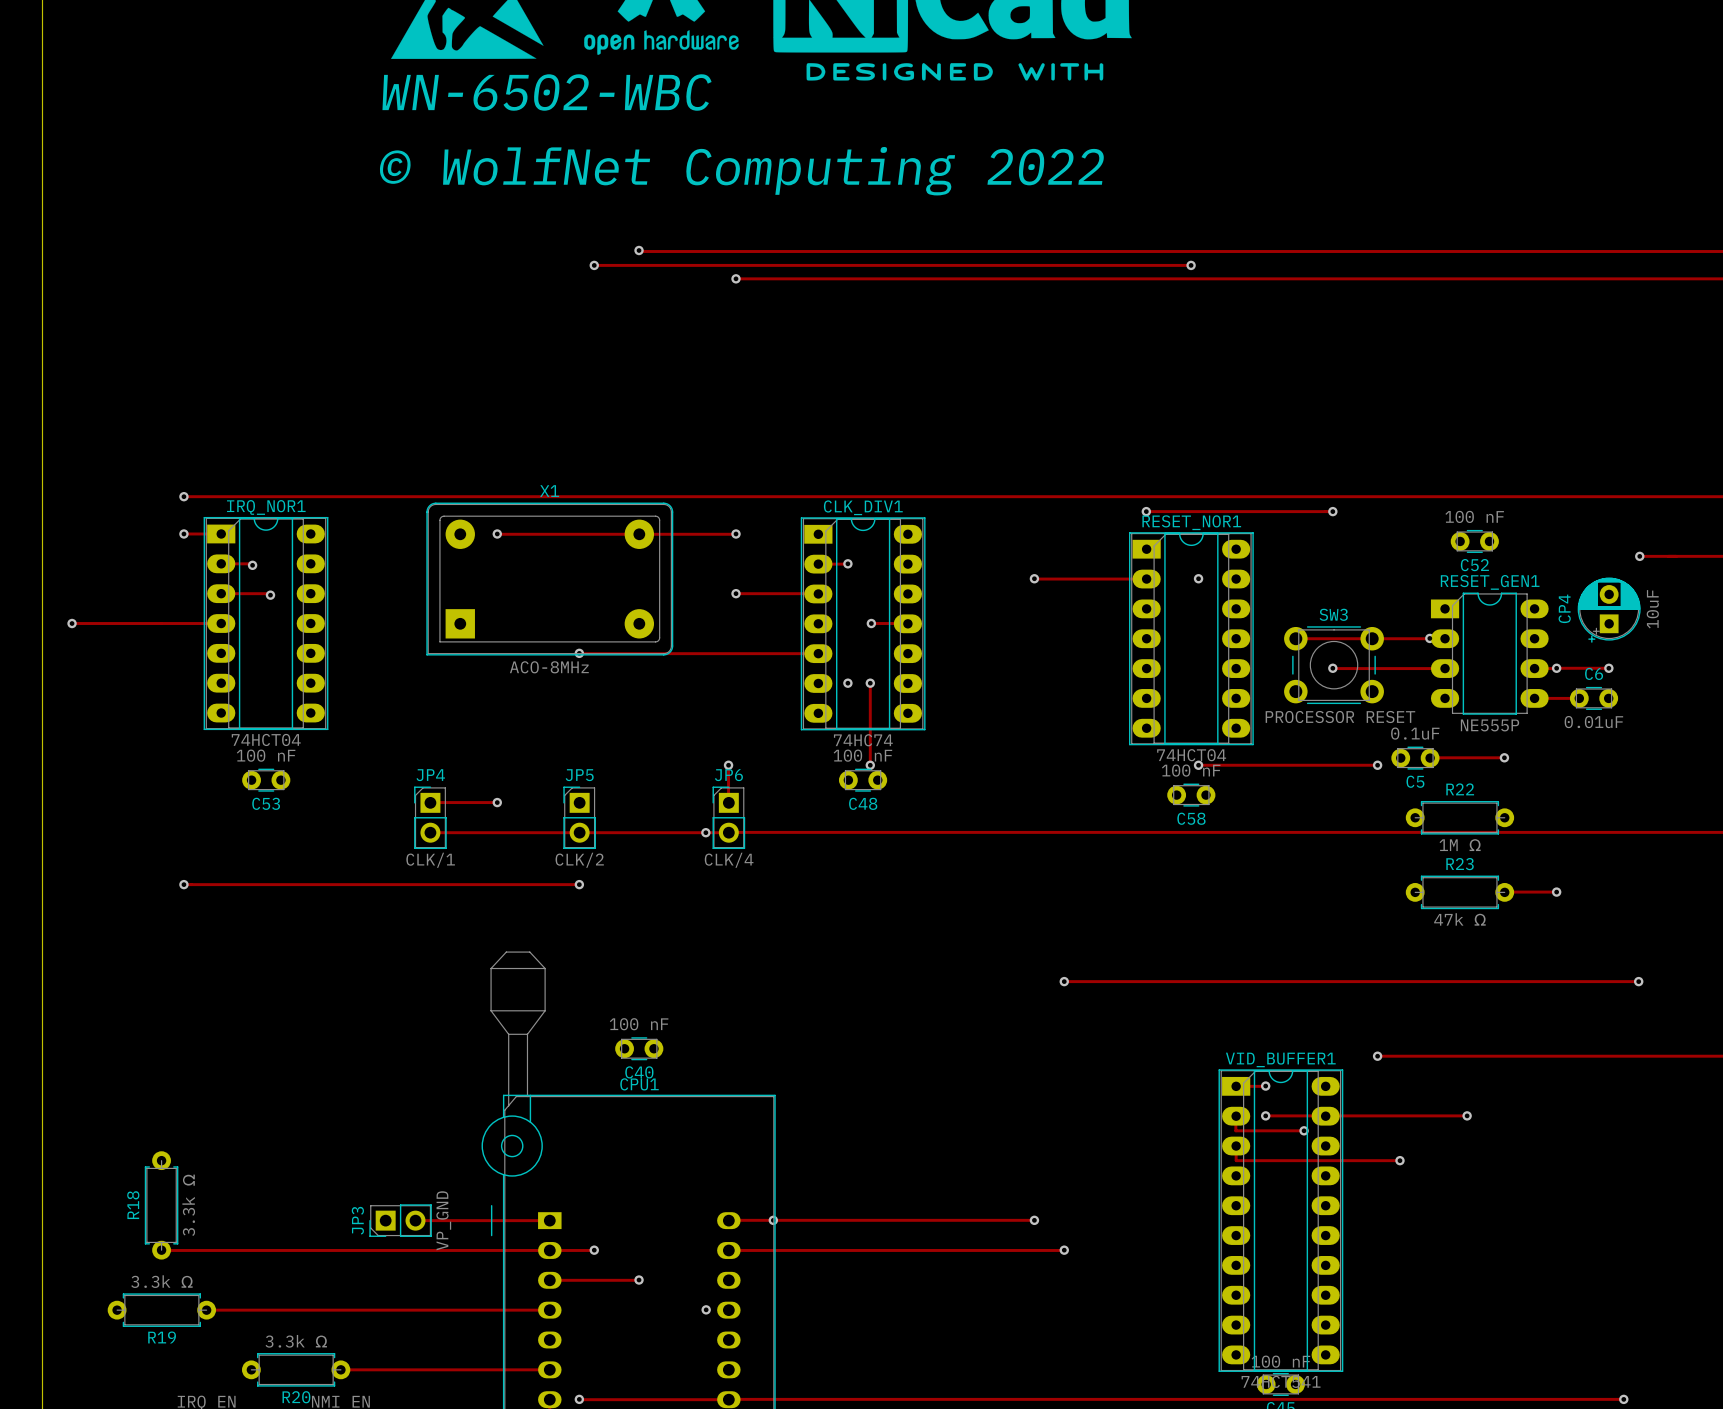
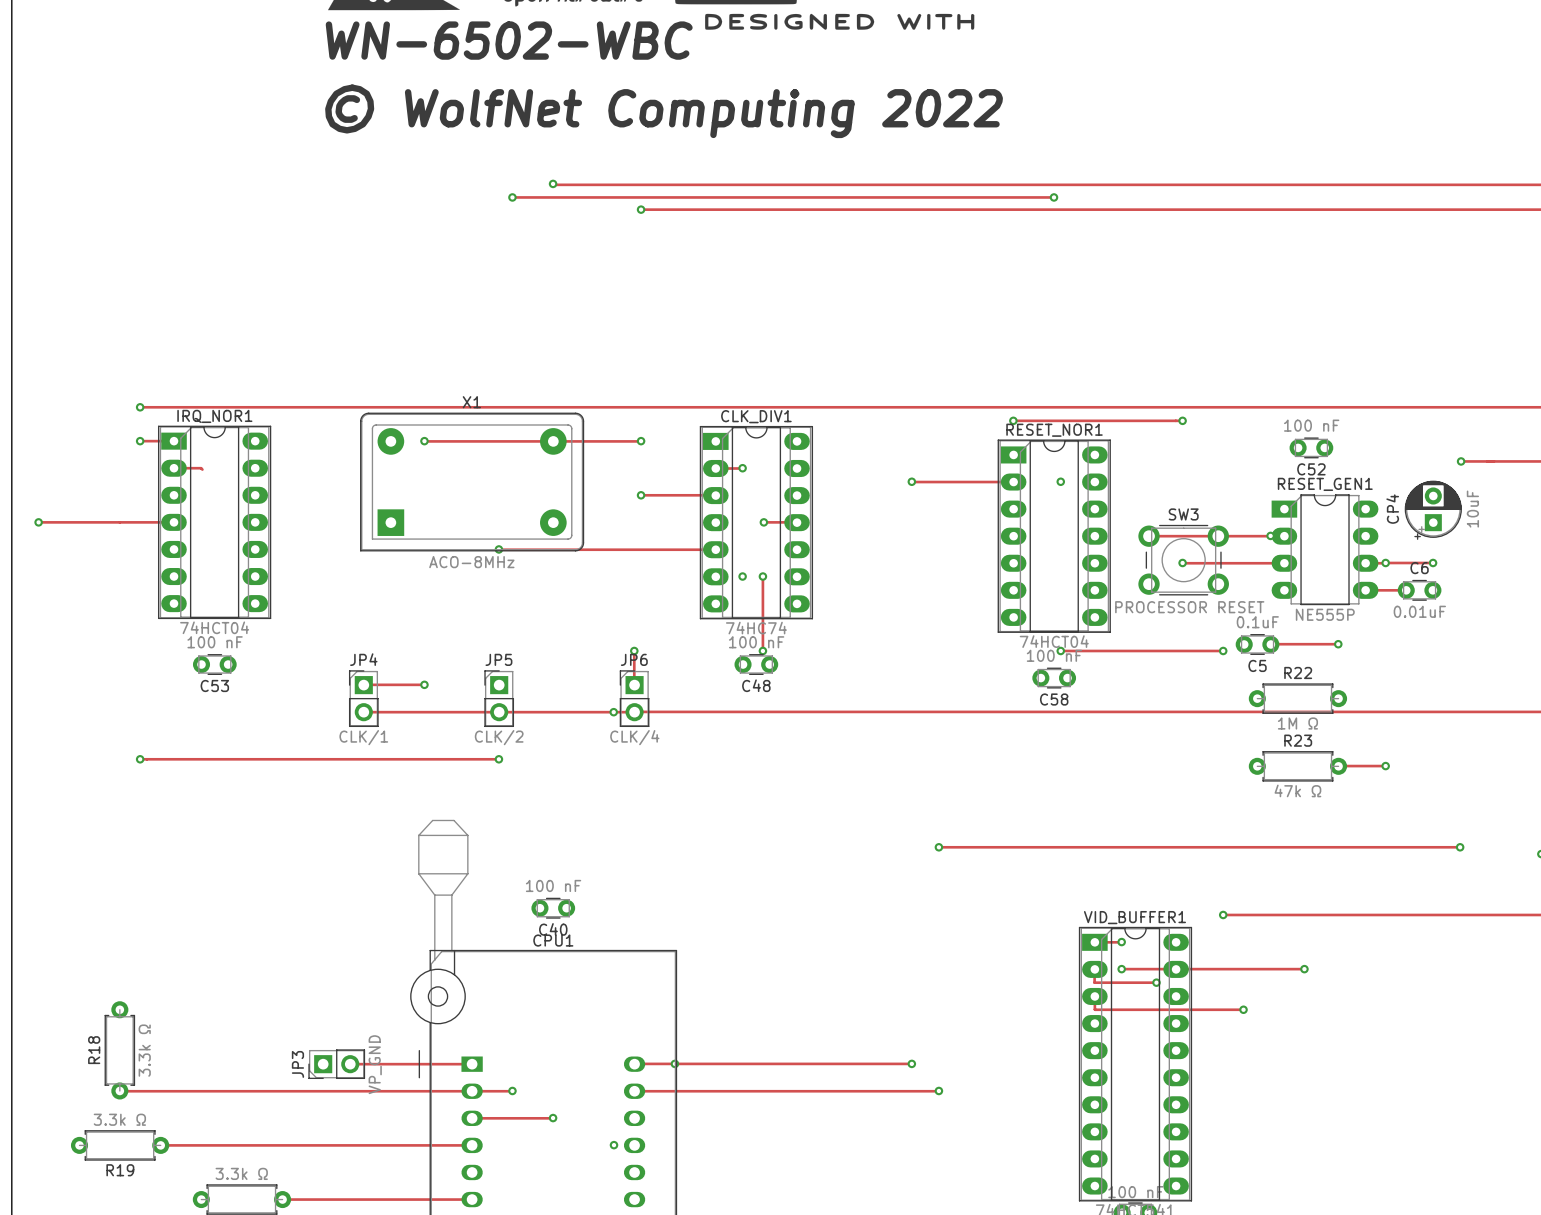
via: (252, 565) -> none
track: (221, 593) (270, 595) -> none
via: (270, 595) -> none

